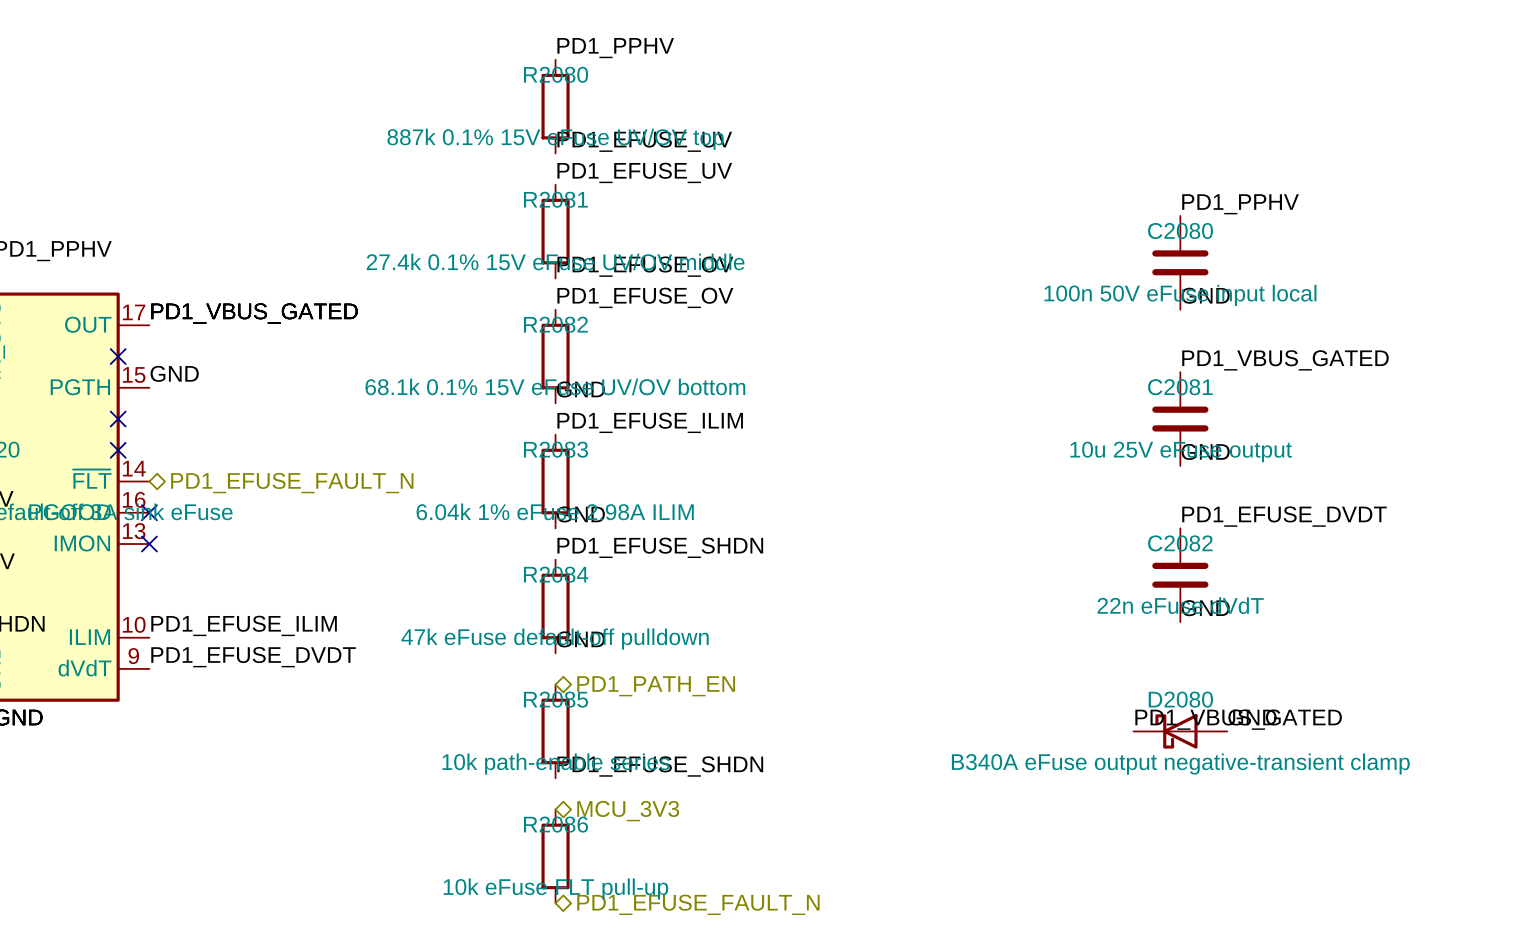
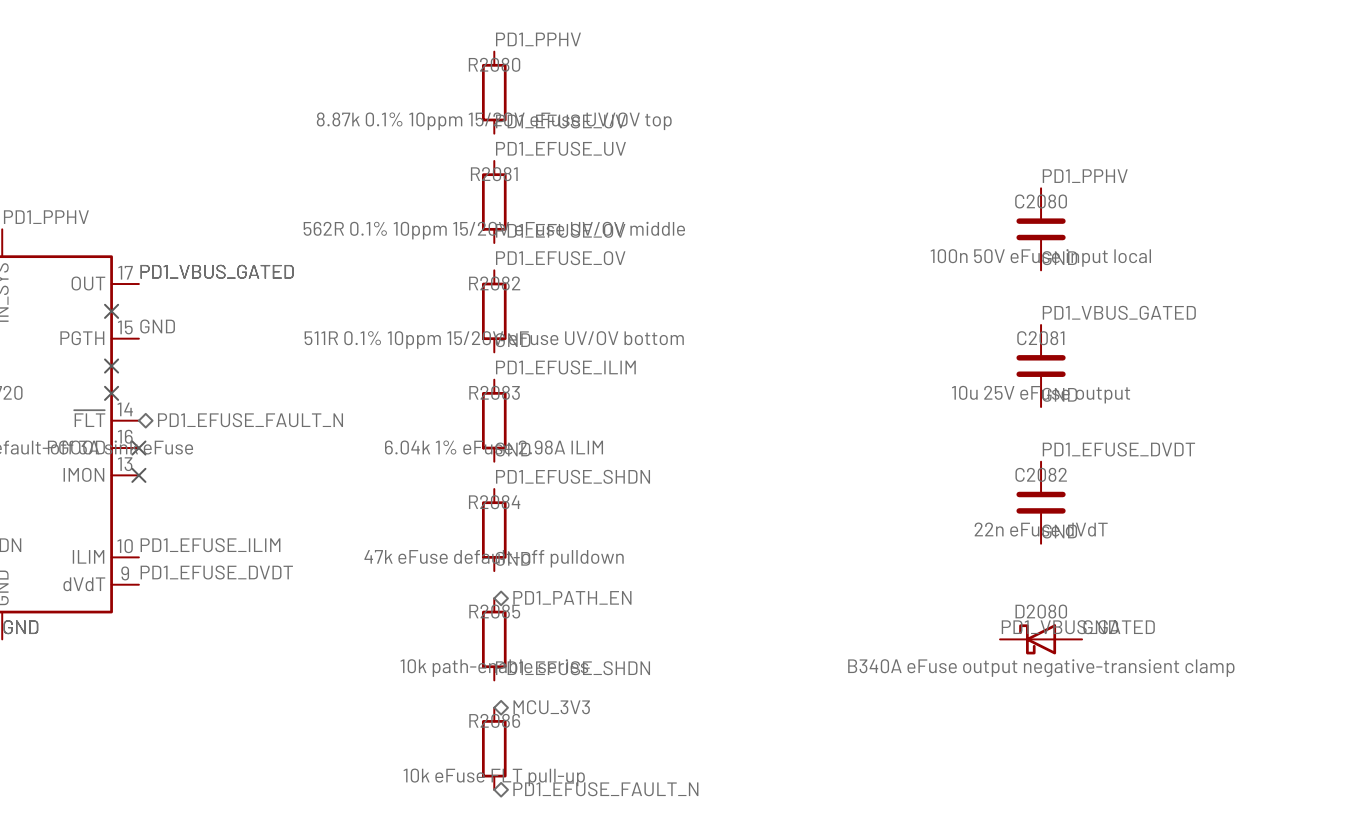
R2080 value: 887k 0.1% 15V eFuse UV/OV top (555, 139) -> 8.87k 0.1% 10ppm 15/20V eFuse UV/OV top (494, 121)
R2081 value: 27.4k 0.1% 15V eFuse UV/OV middle (555, 261) -> 562R 0.1% 10ppm 15/20V eFuse UV/OV middle (494, 230)
R2082 value: 68.1k 0.1% 15V eFuse UV/OV bottom (555, 386) -> 511R 0.1% 10ppm 15/20V eFuse UV/OV bottom (494, 339)

